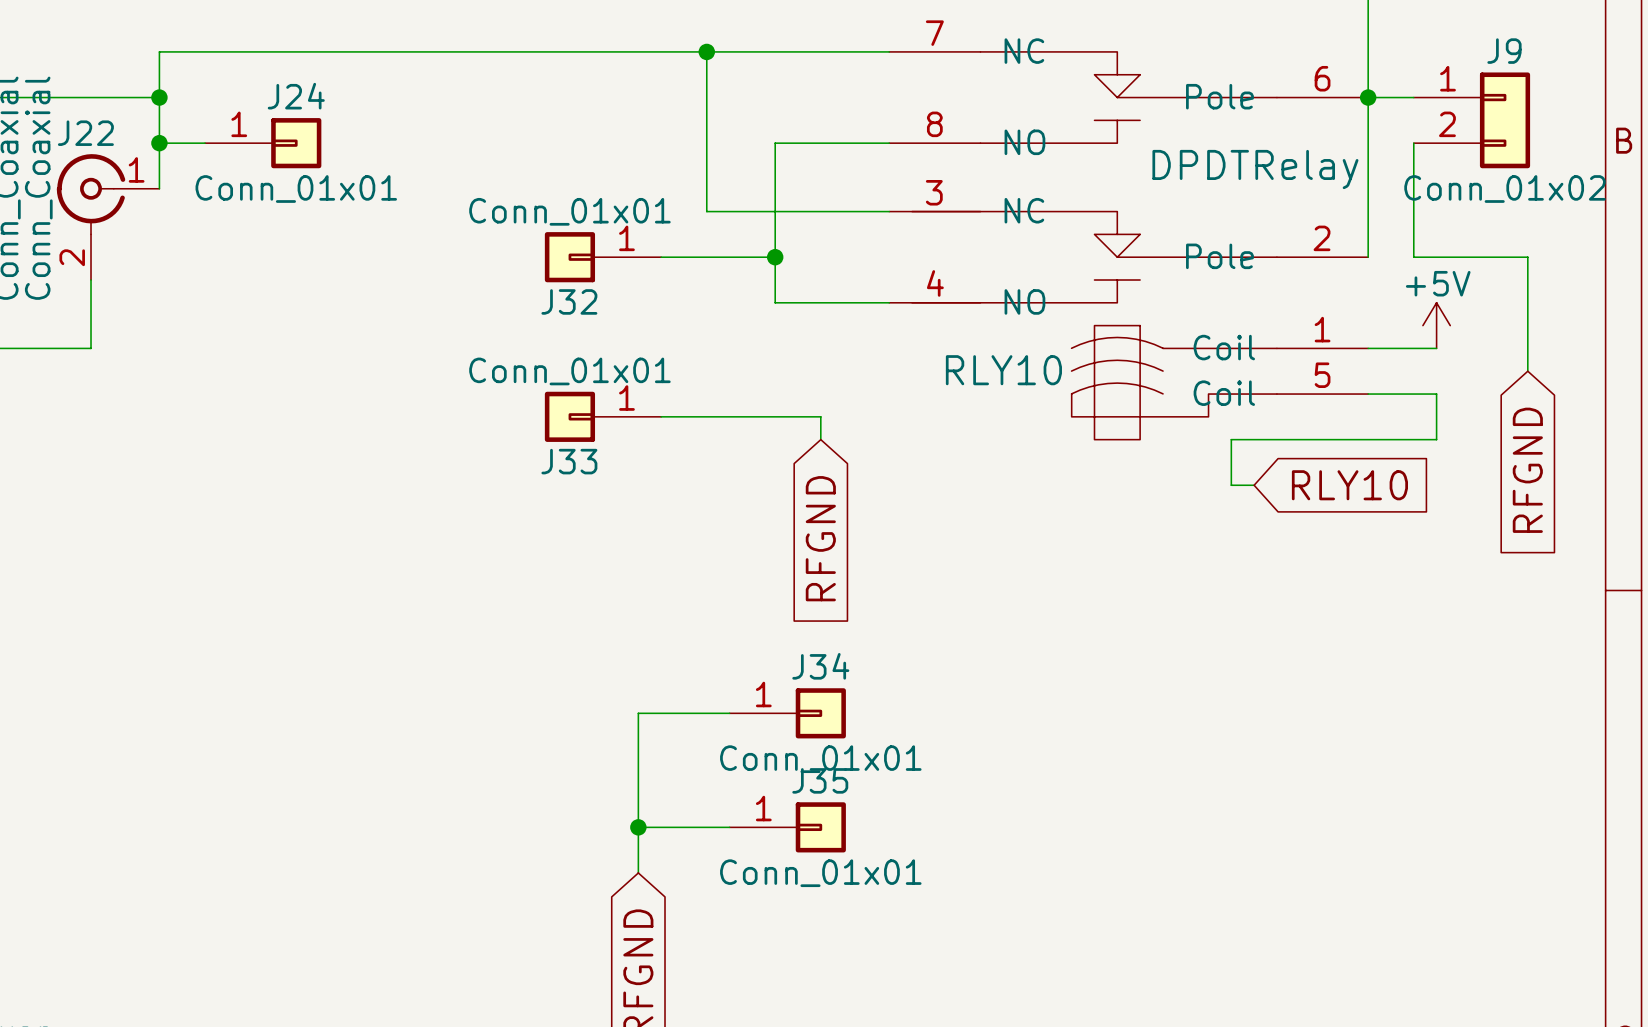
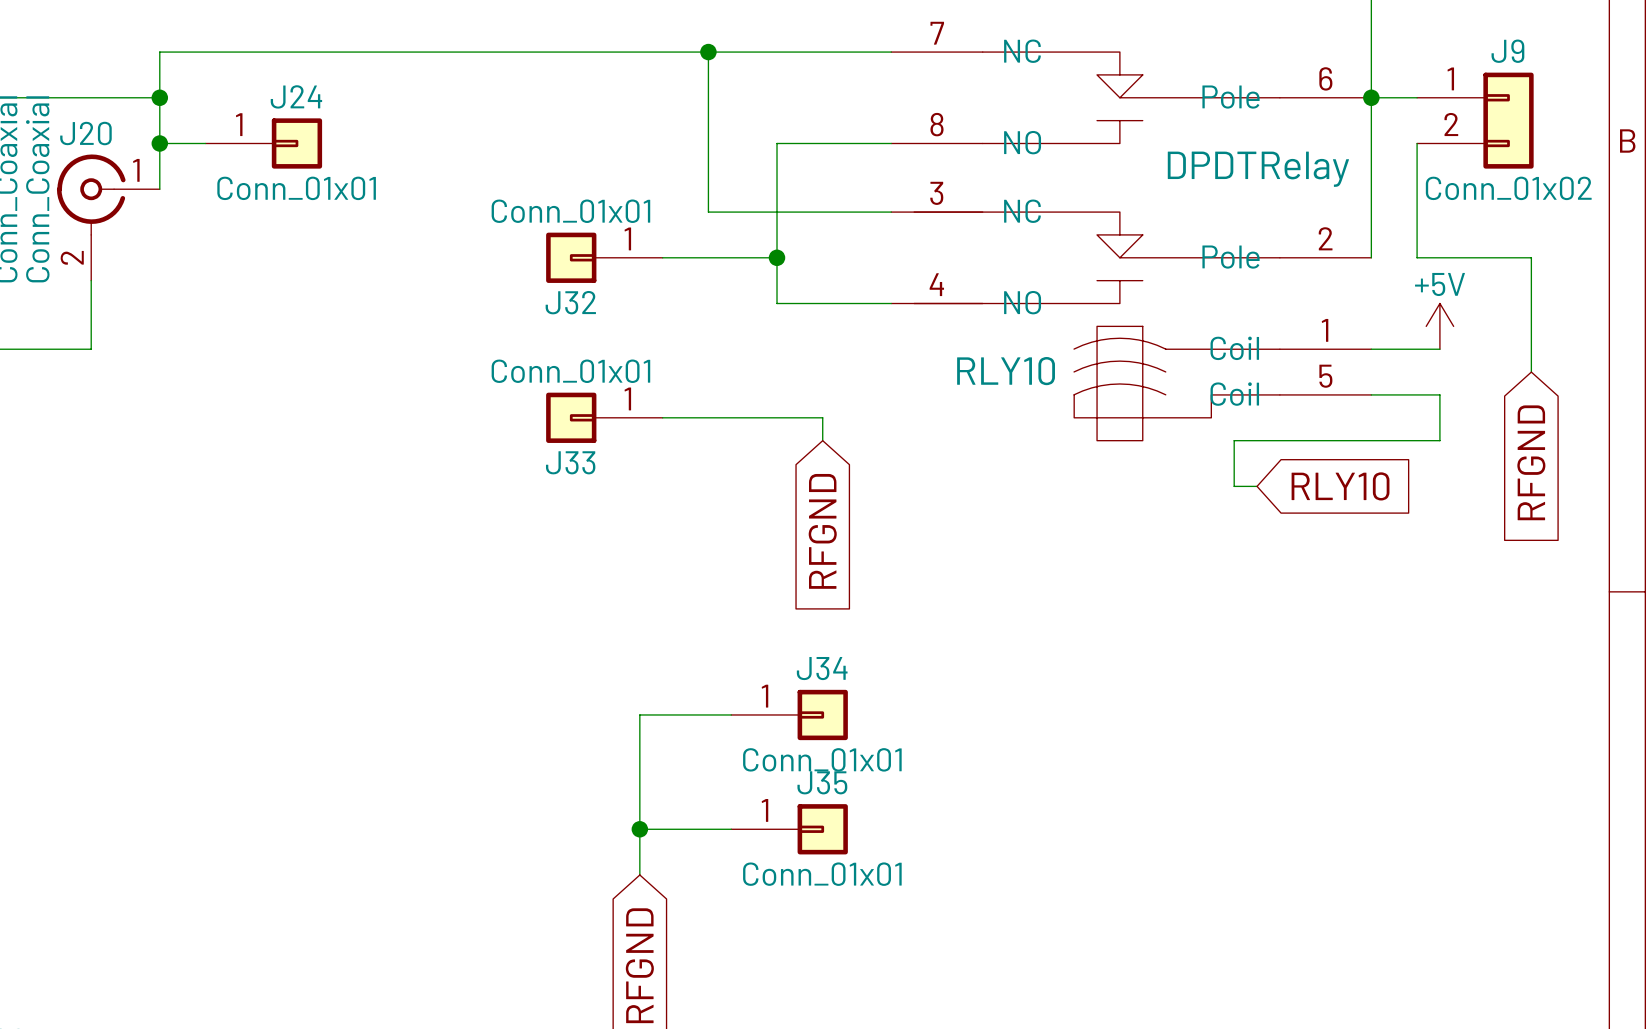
J22 name: J22 (85, 133) -> J20 (85, 133)

